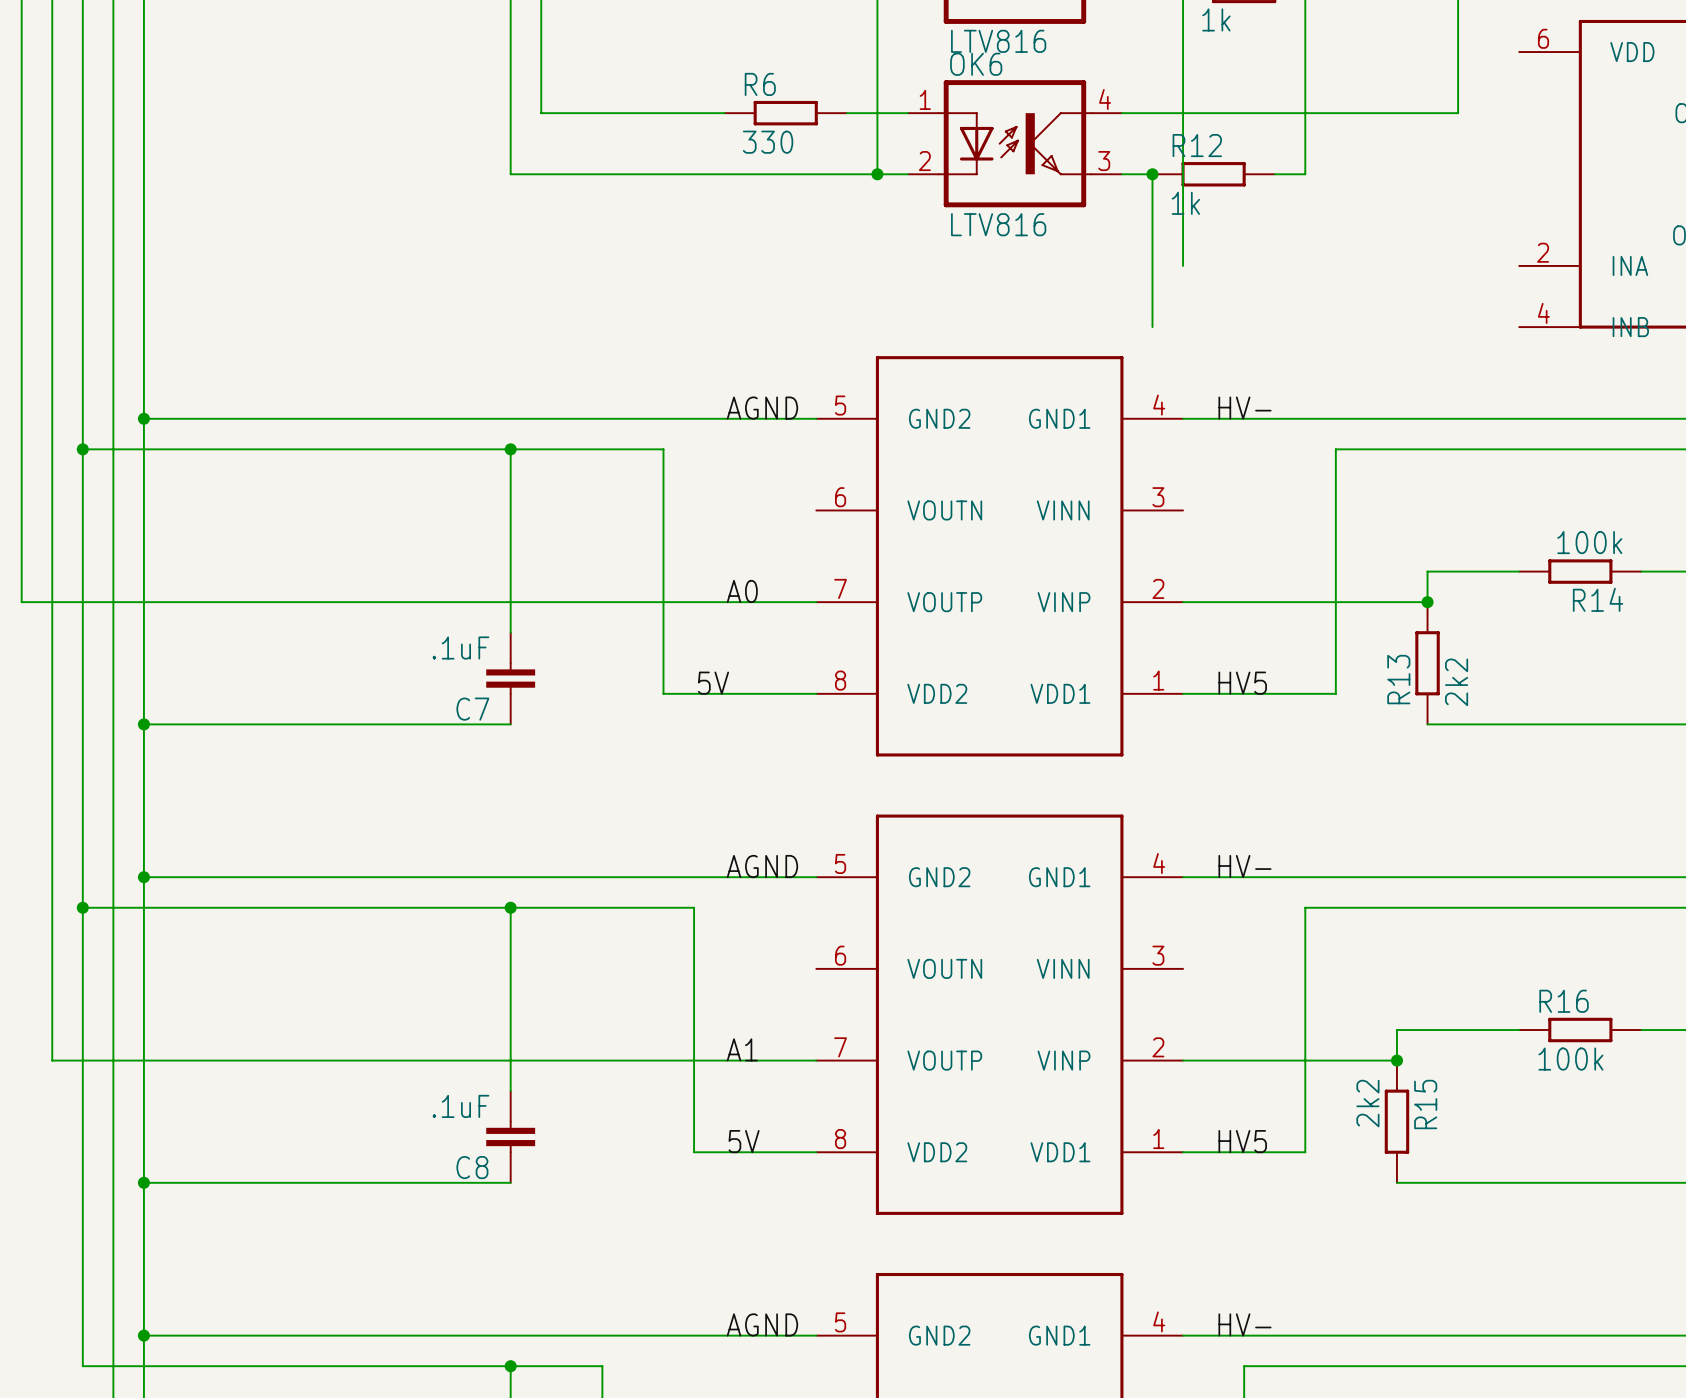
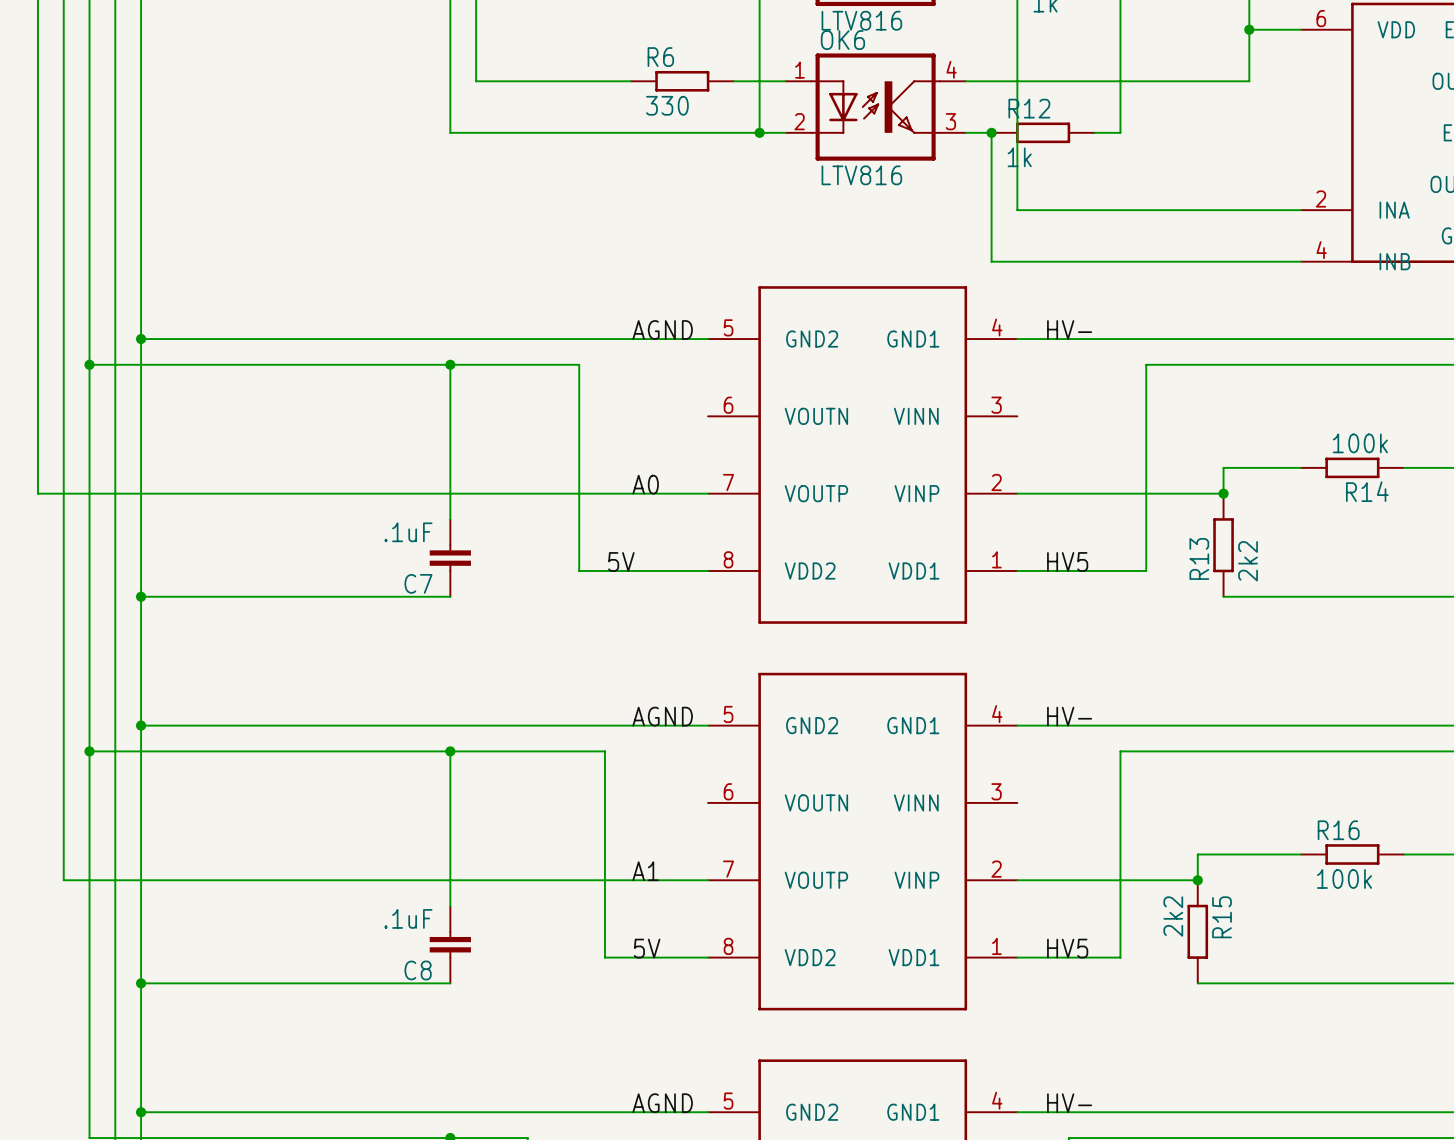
wire: none -> (1249, 29) (1300, 29)
junction: none -> (1249, 29)
wire: none -> (1017, 210) (1300, 210)
wire: none -> (991, 261) (1300, 261)

